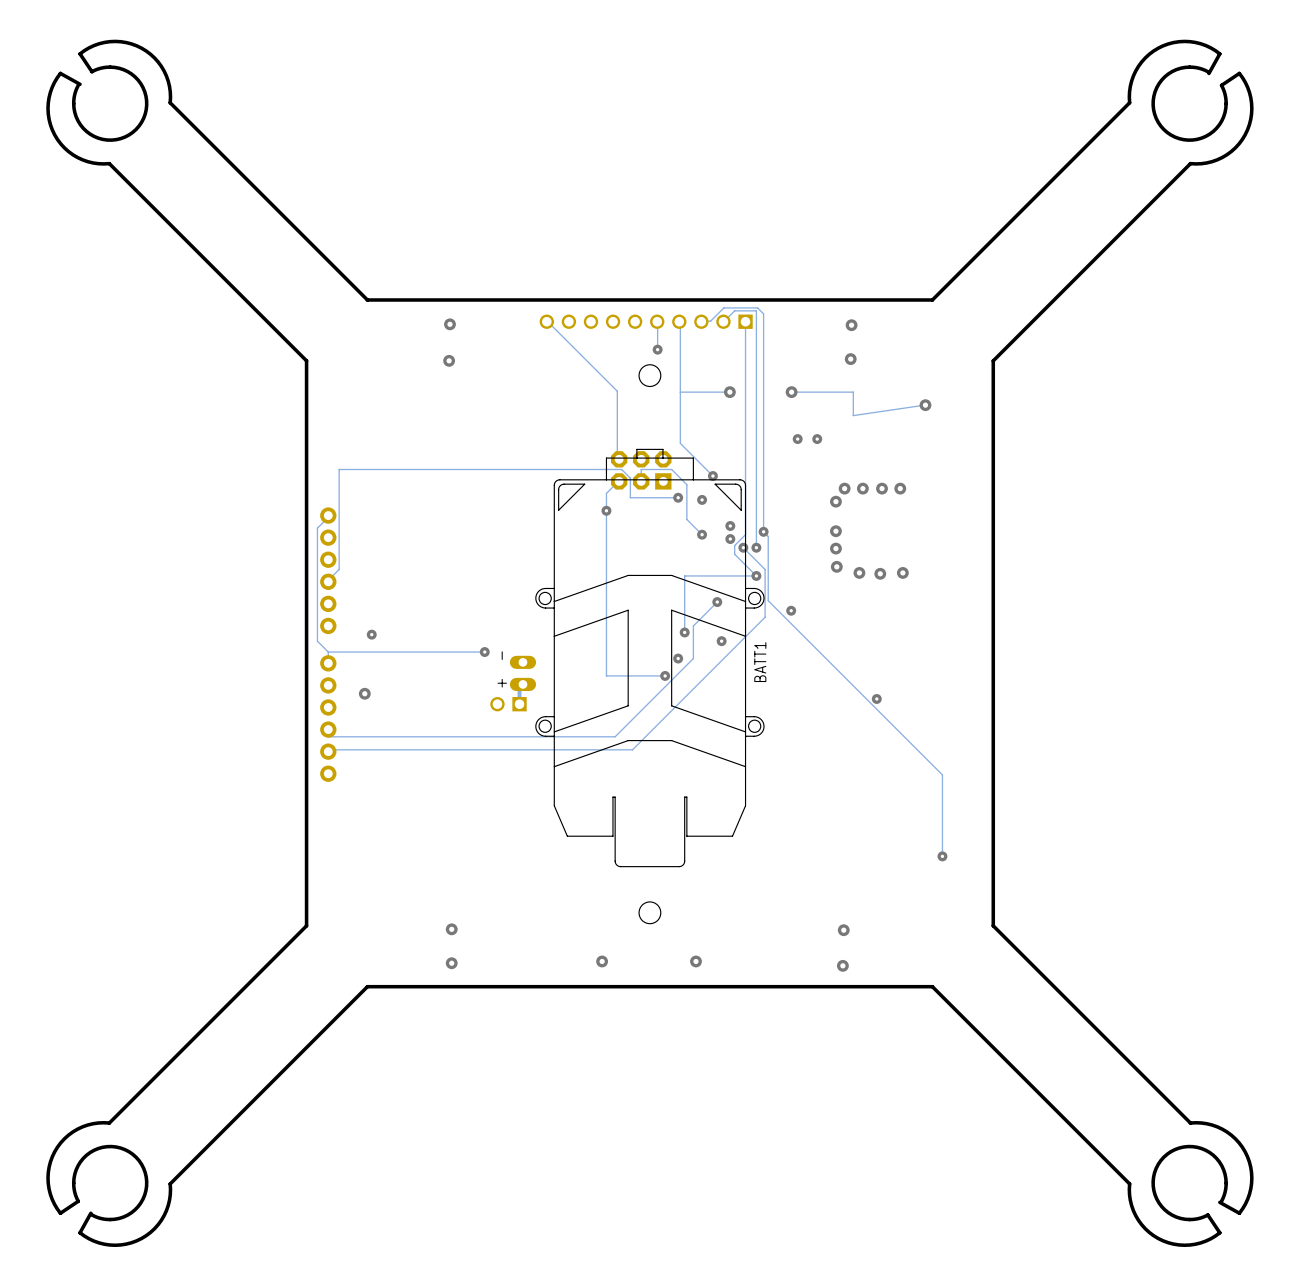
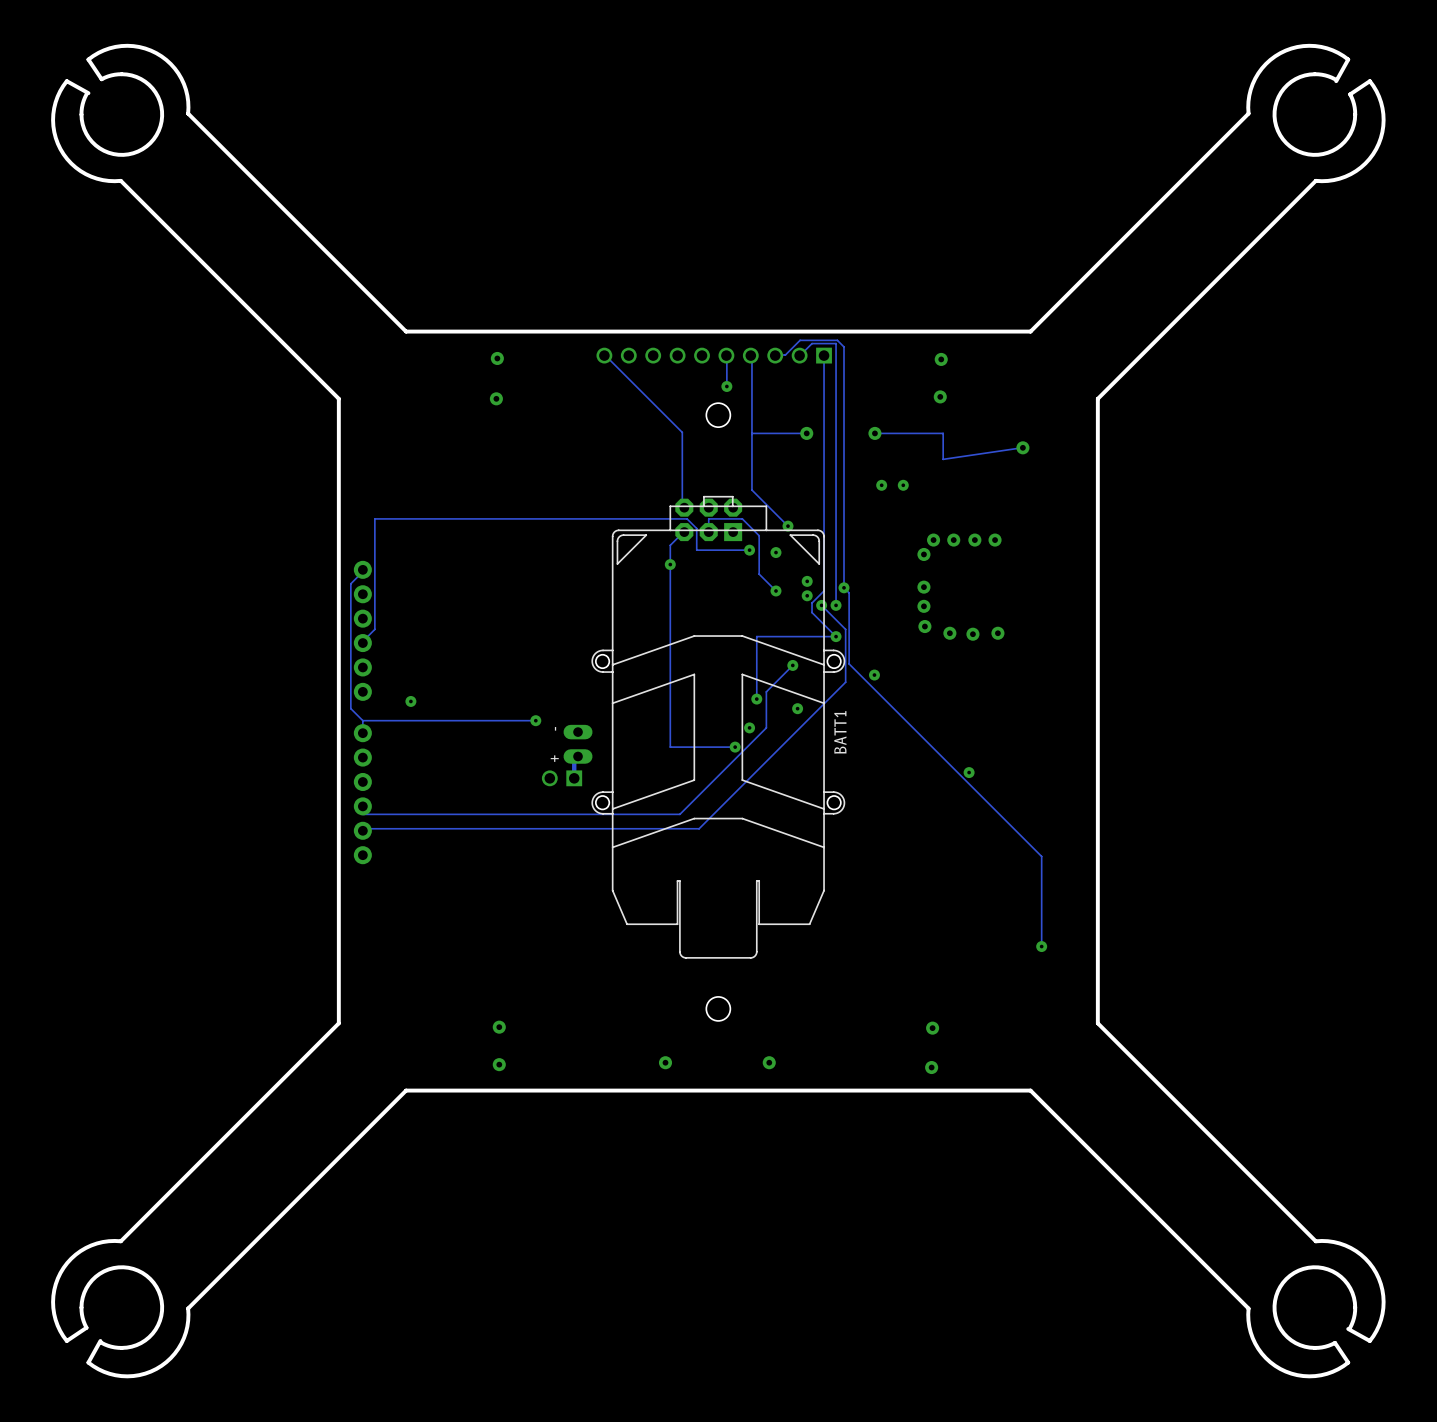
via: (364, 693) -> none

